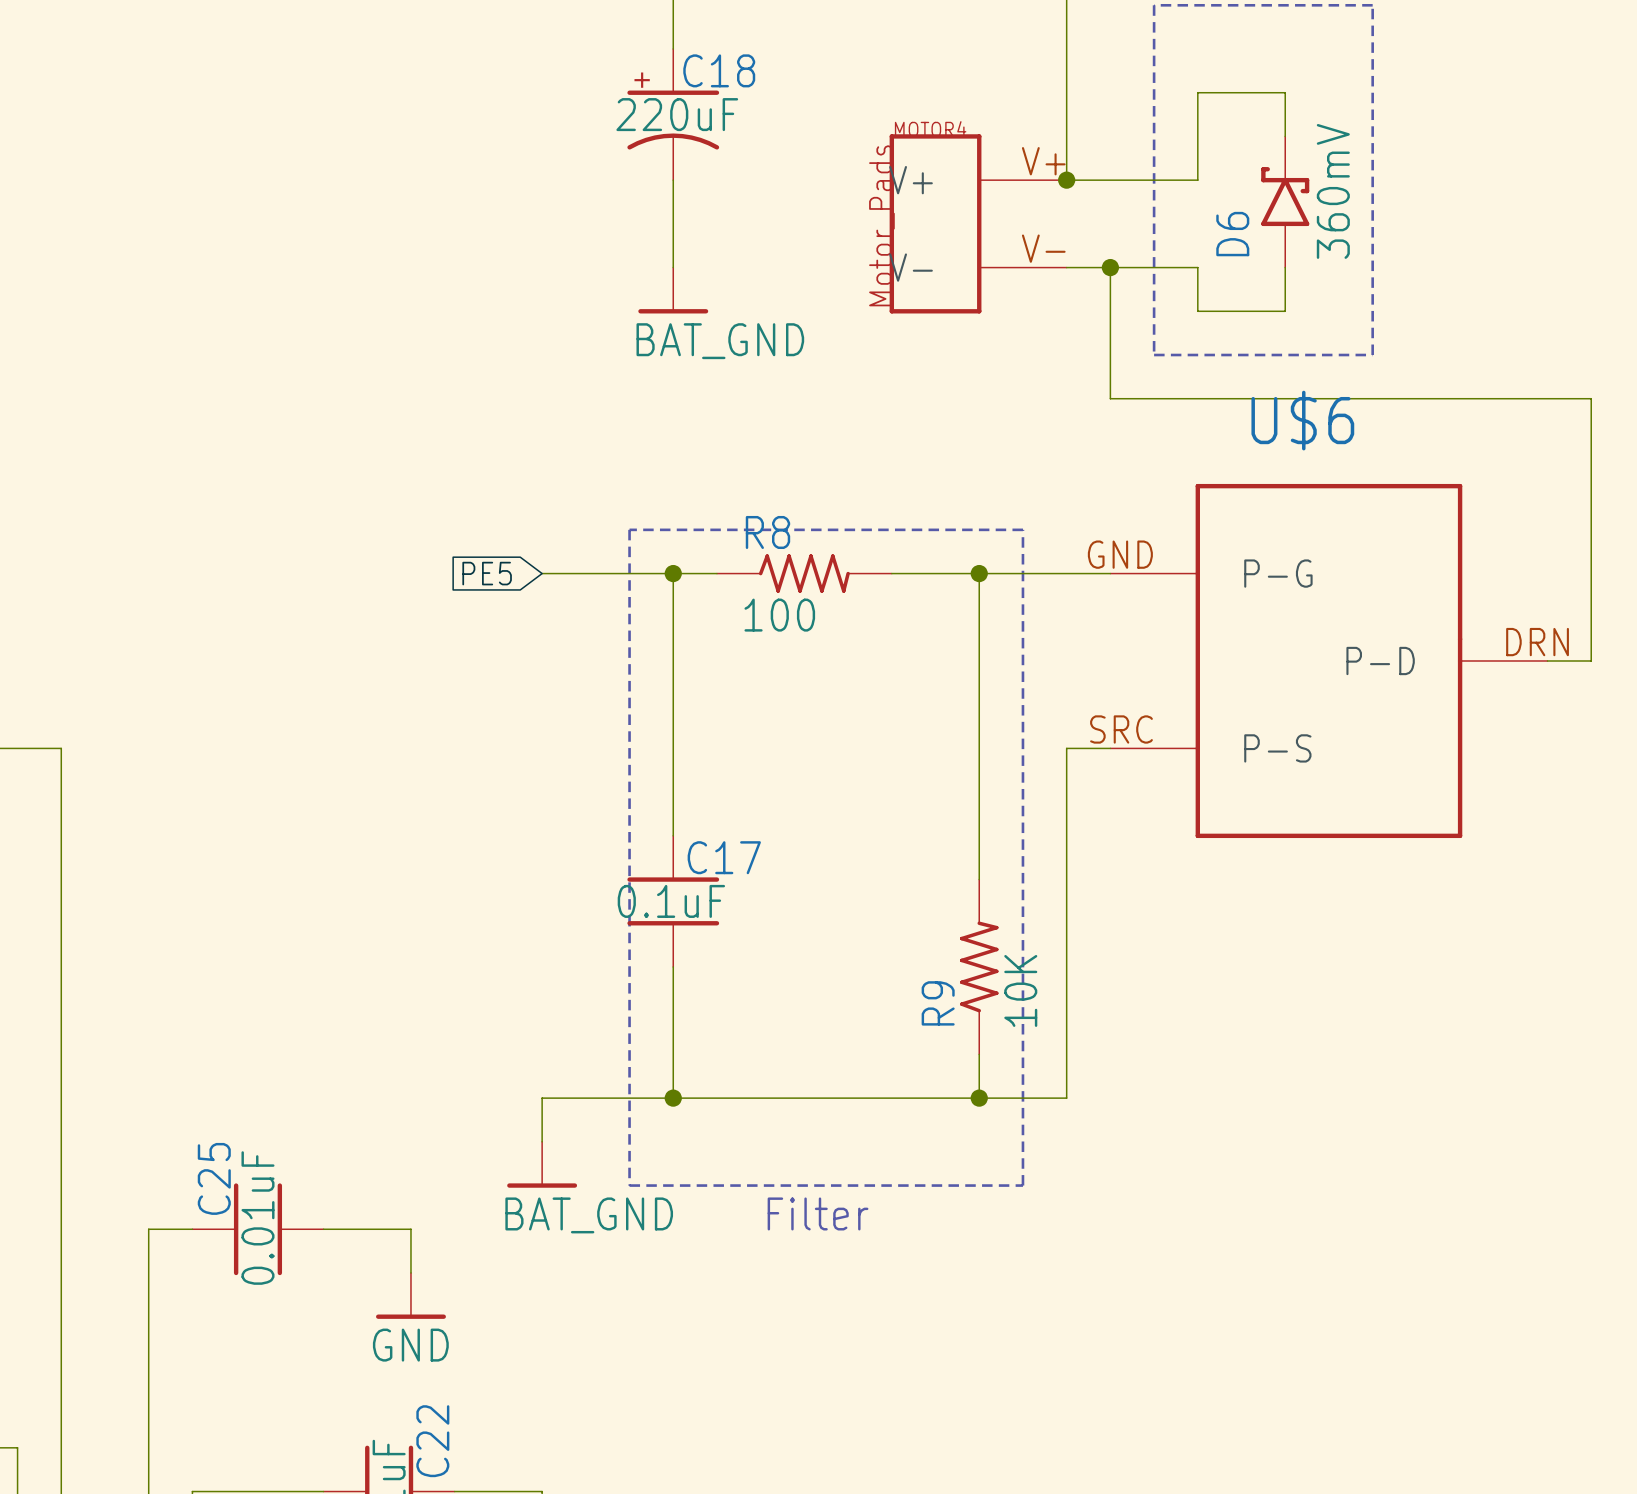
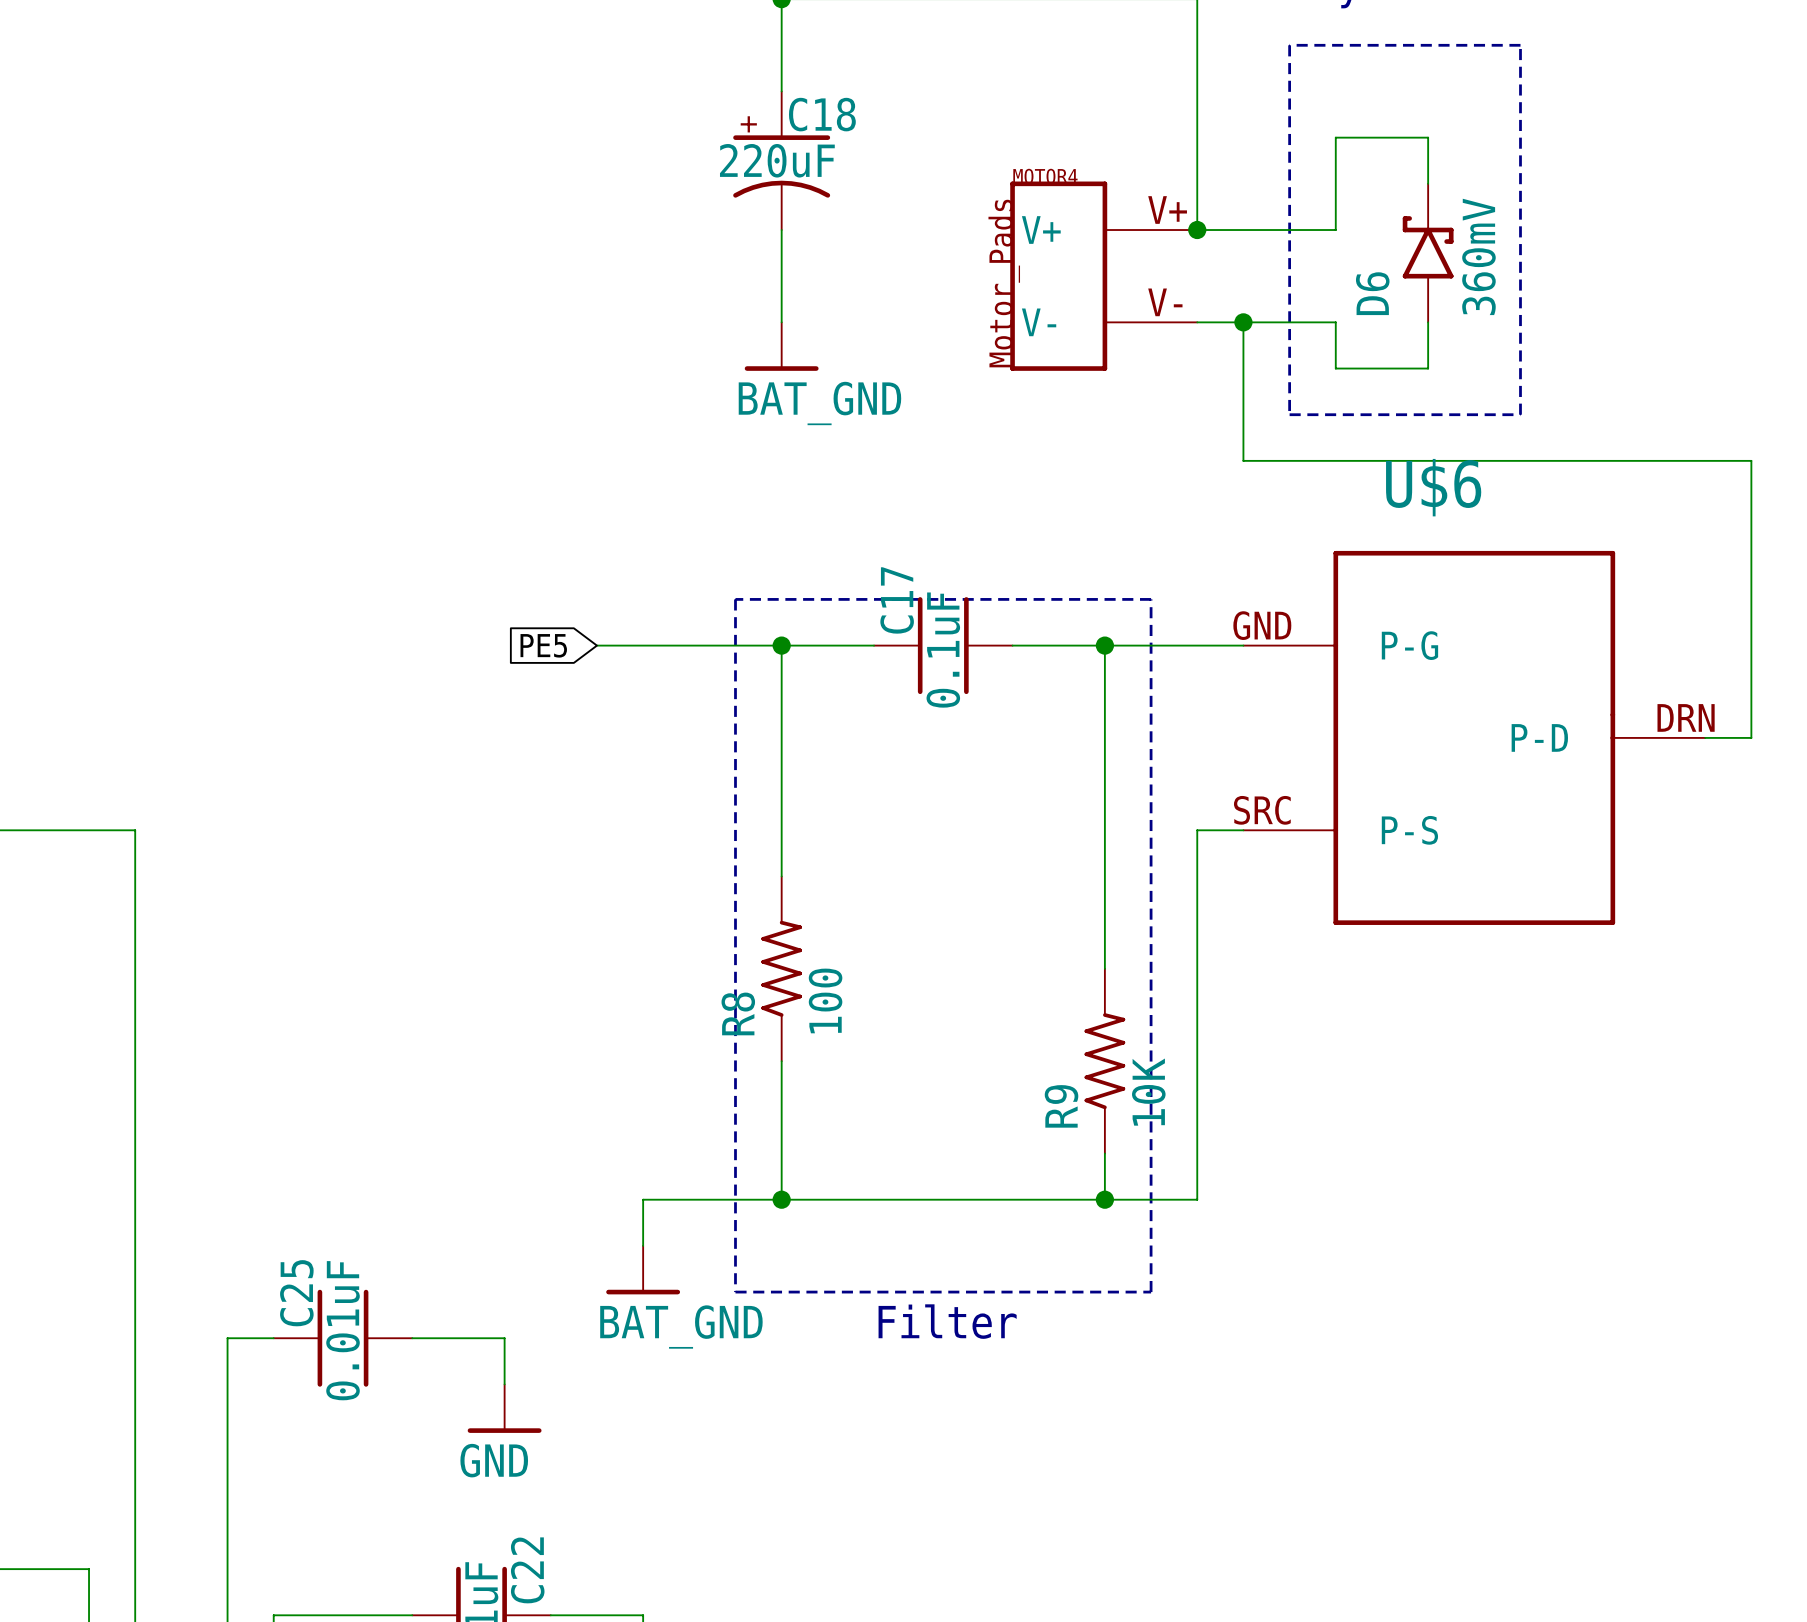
global label position: PE5 (487, 573) -> PE5 (543, 645)
wire: none -> (596, 645) (643, 645)
R8 rotation: 0° (804, 573) -> 90° counterclockwise (781, 968)
R8 position: (804, 573) -> (781, 968)
C17 name position: C17 (724, 857) -> C17 (897, 600)
C17 rotation: 0° (673, 901) -> 90° clockwise (943, 645)
C17 position: (673, 901) -> (943, 645)

